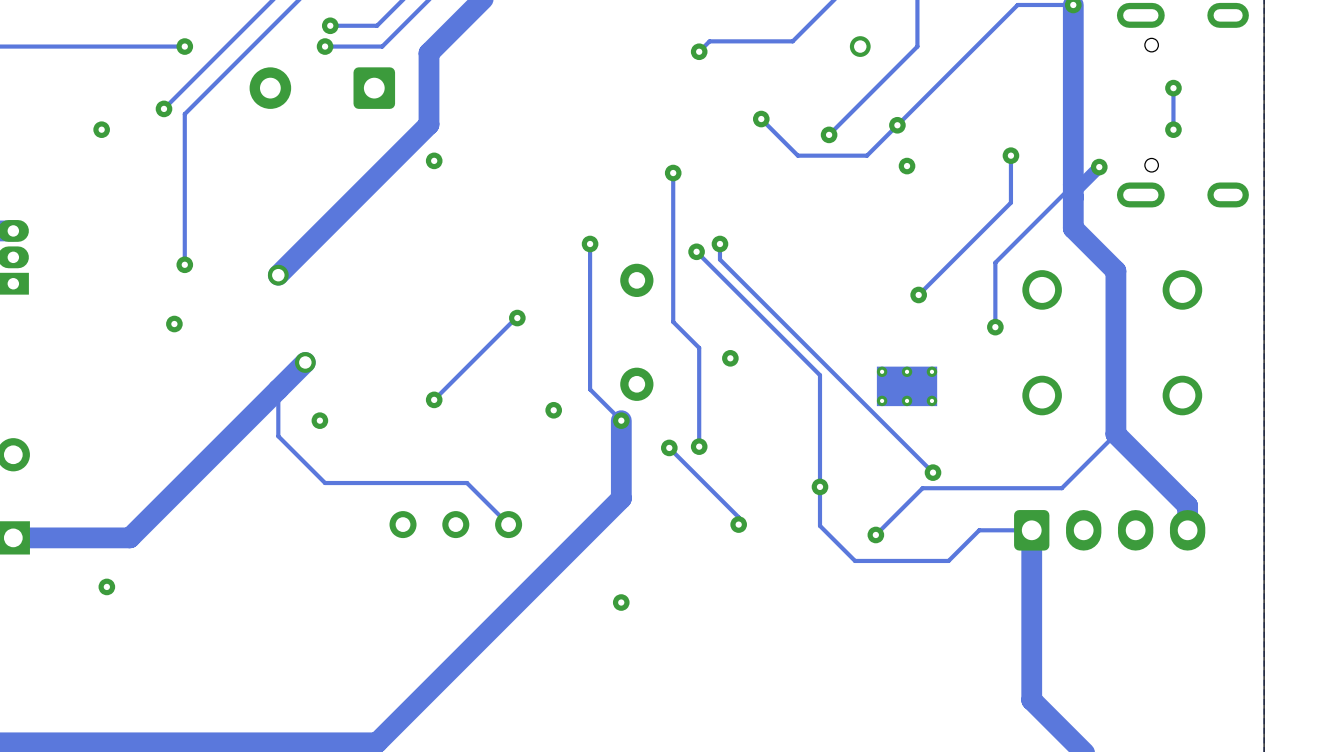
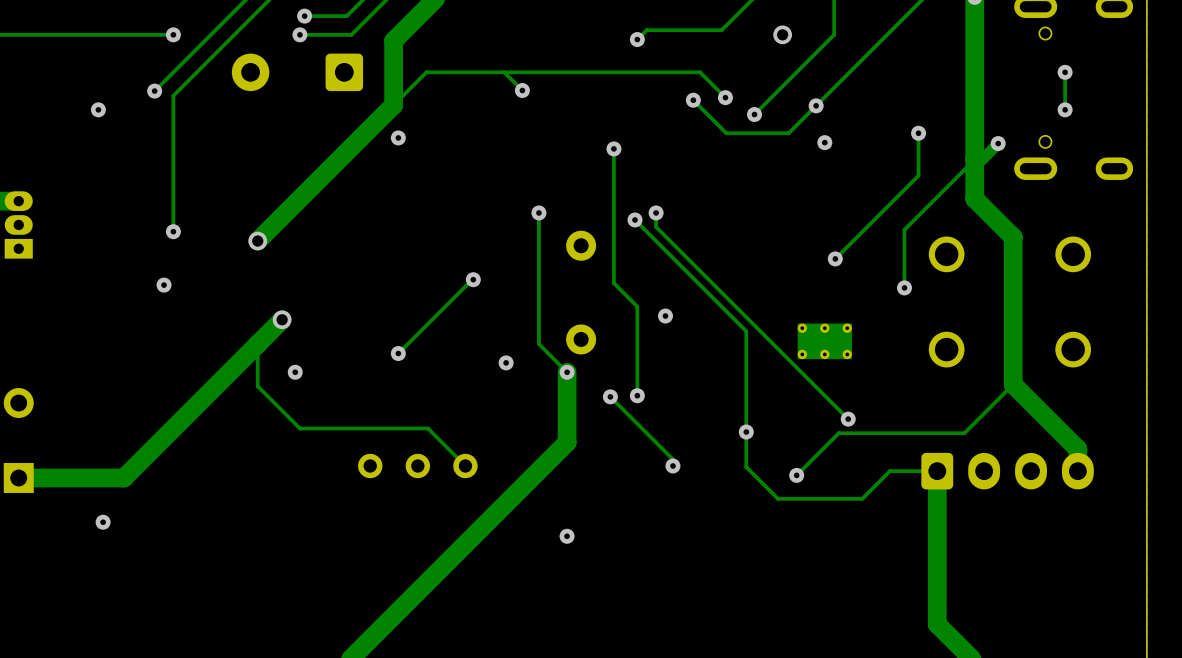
track: none -> (504, 72) (522, 90)
via: none -> (522, 90)
track: none -> (725, 97) (700, 72) (426, 72) (393, 105)
via: none -> (725, 97)

